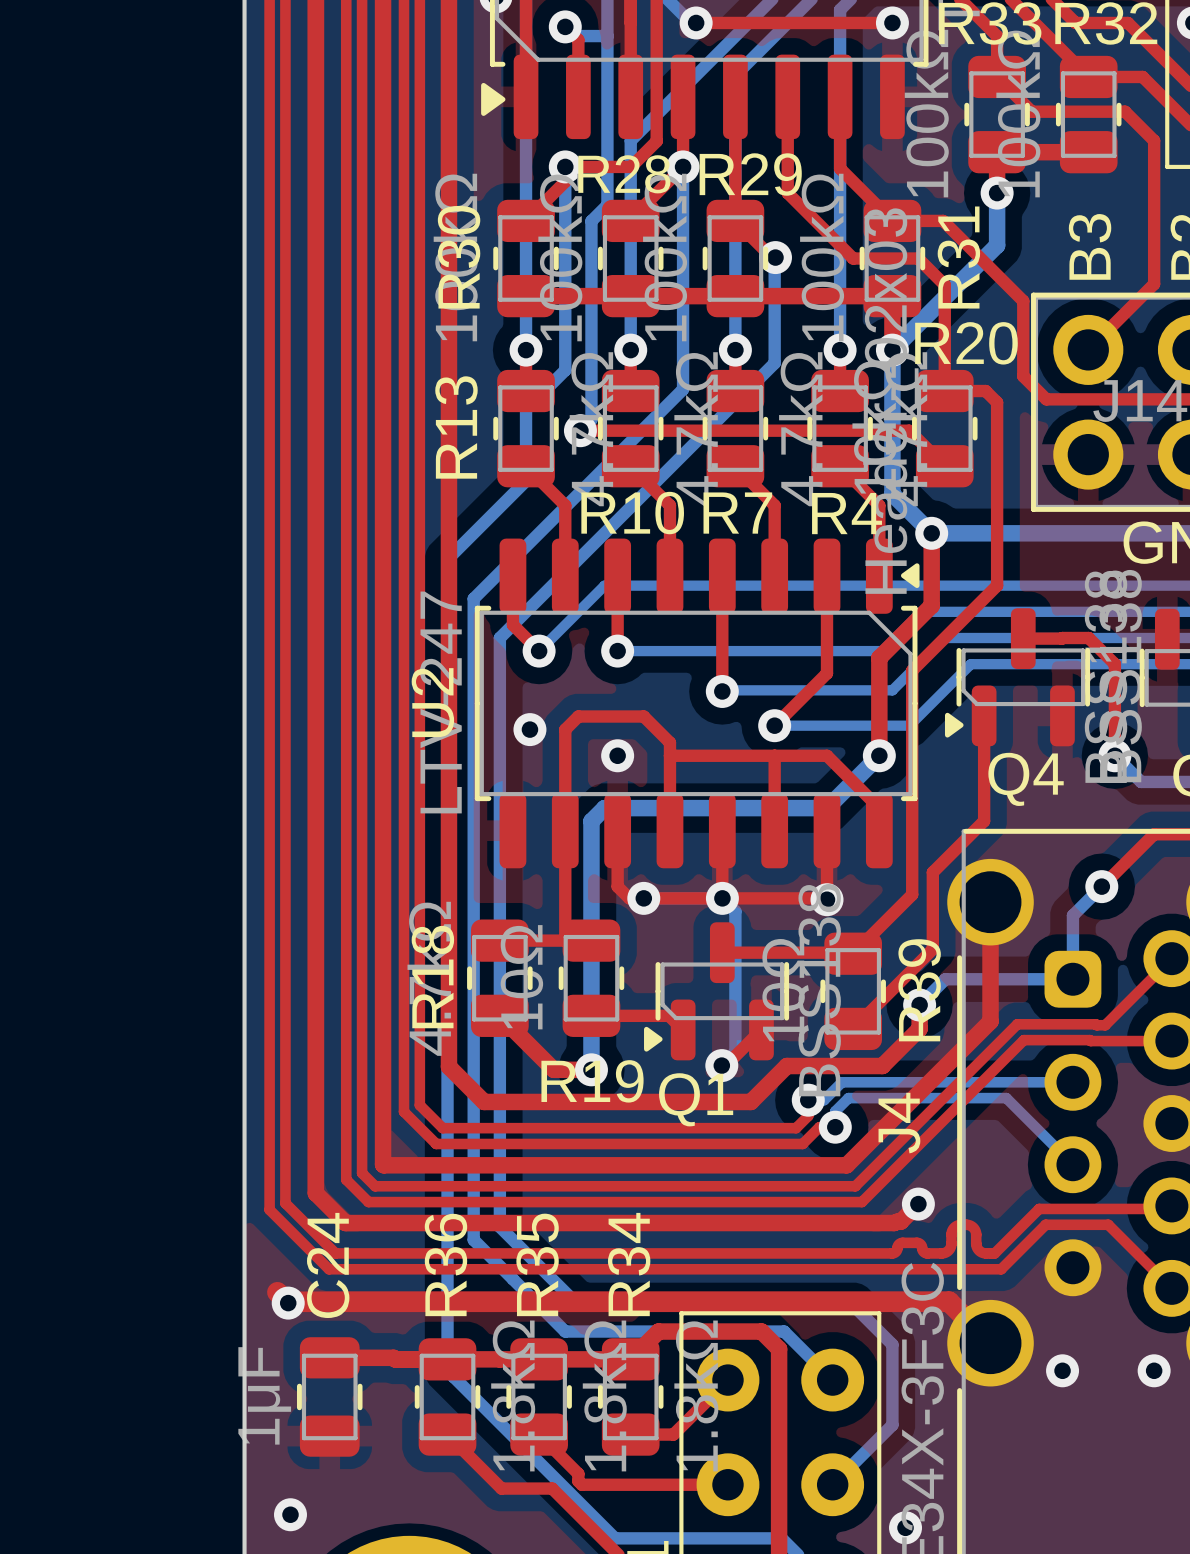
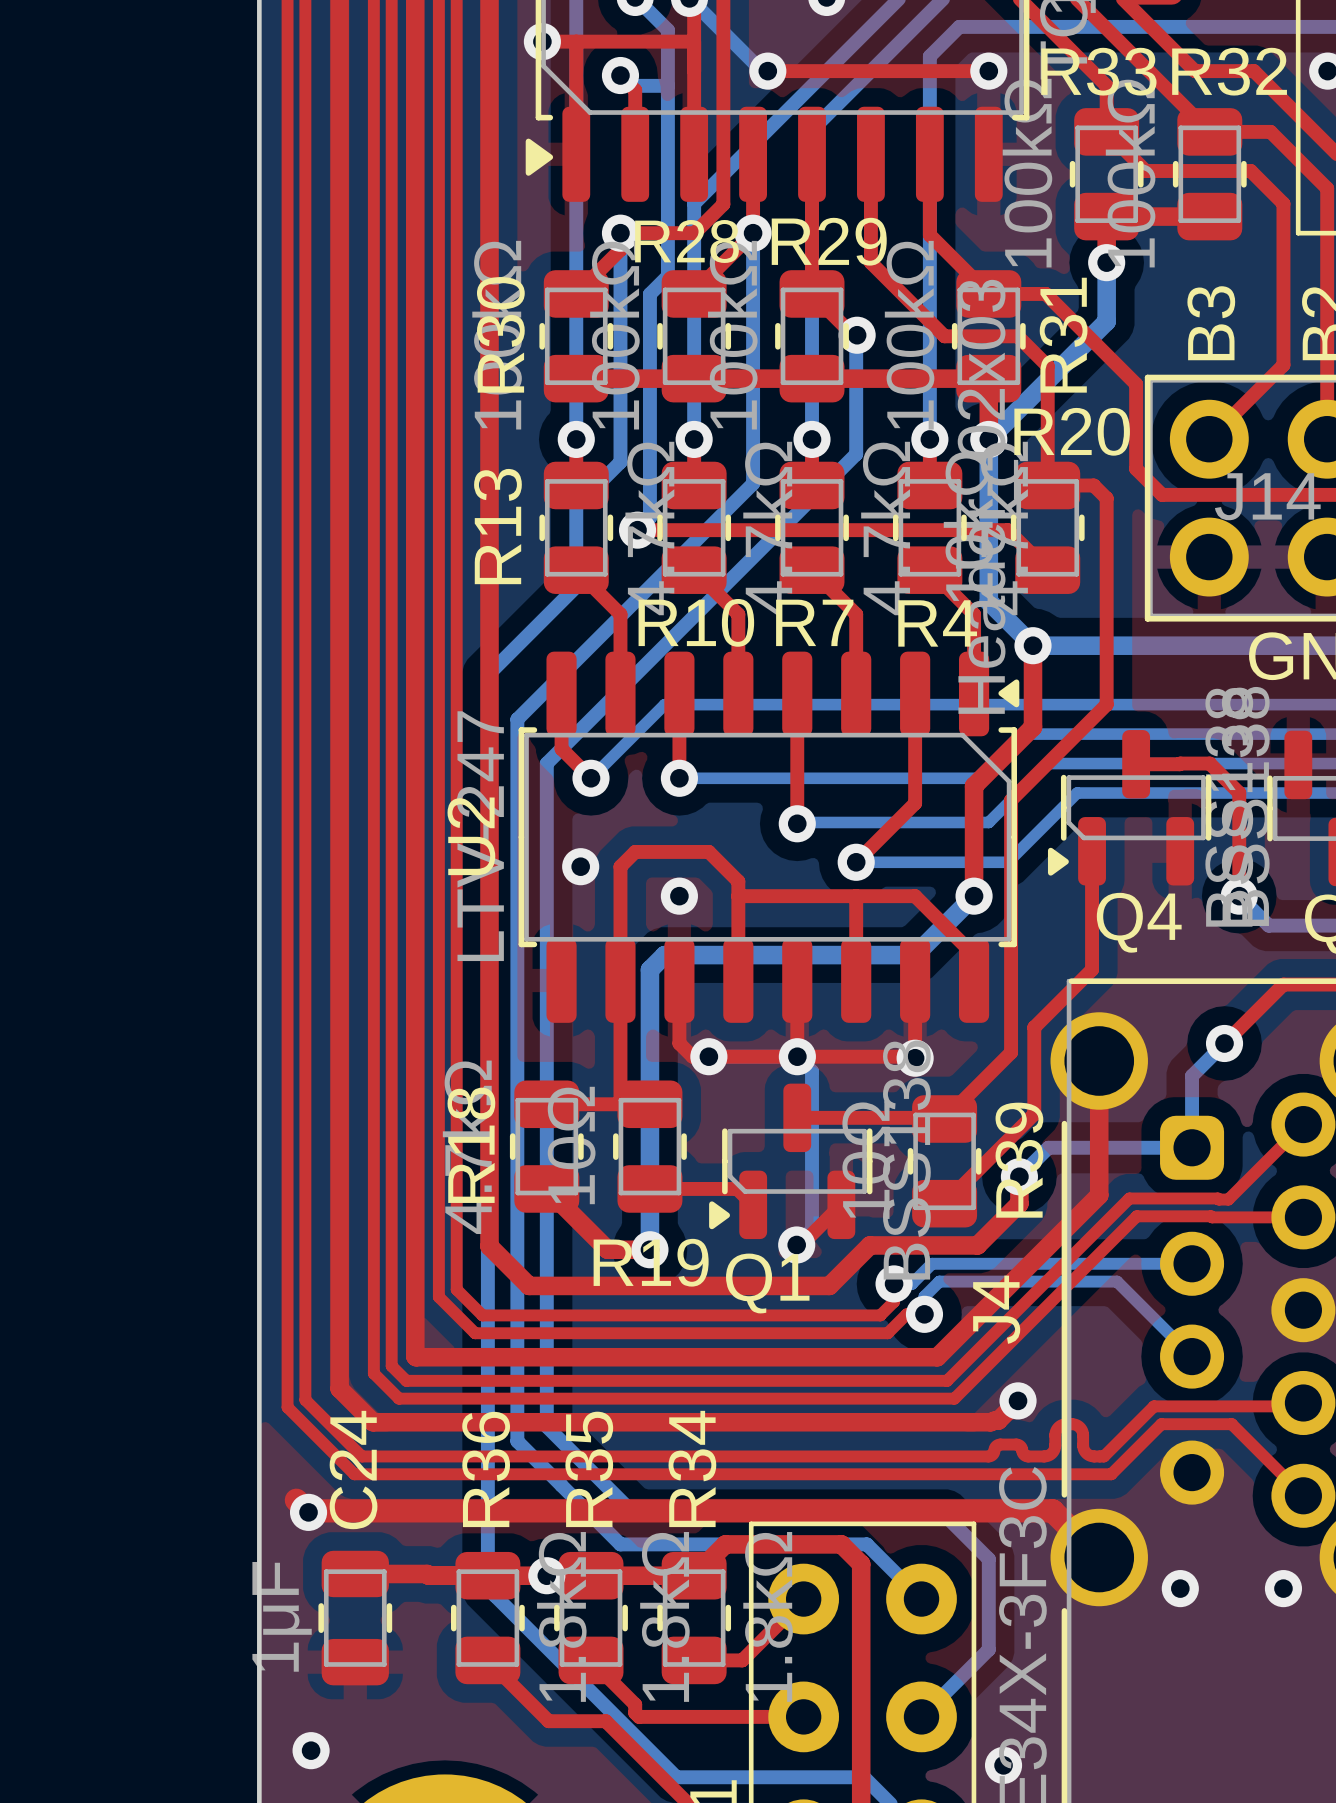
via: none -> (546, 1575)

